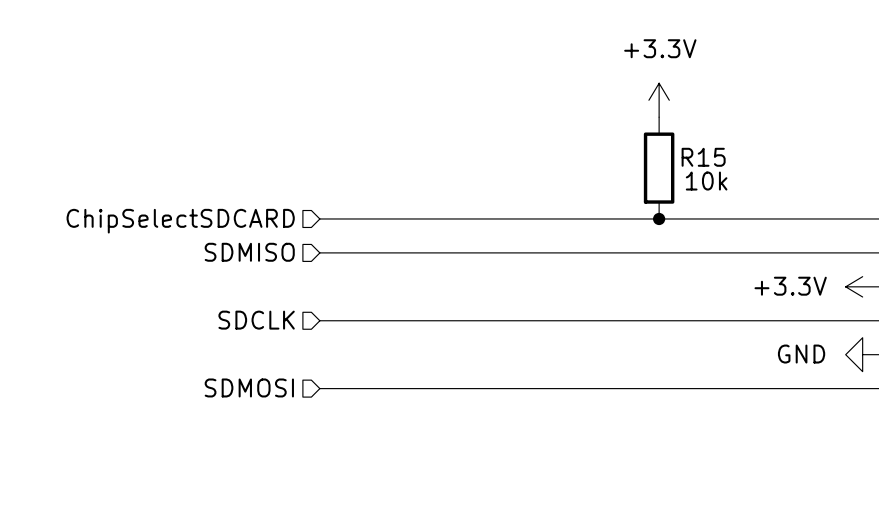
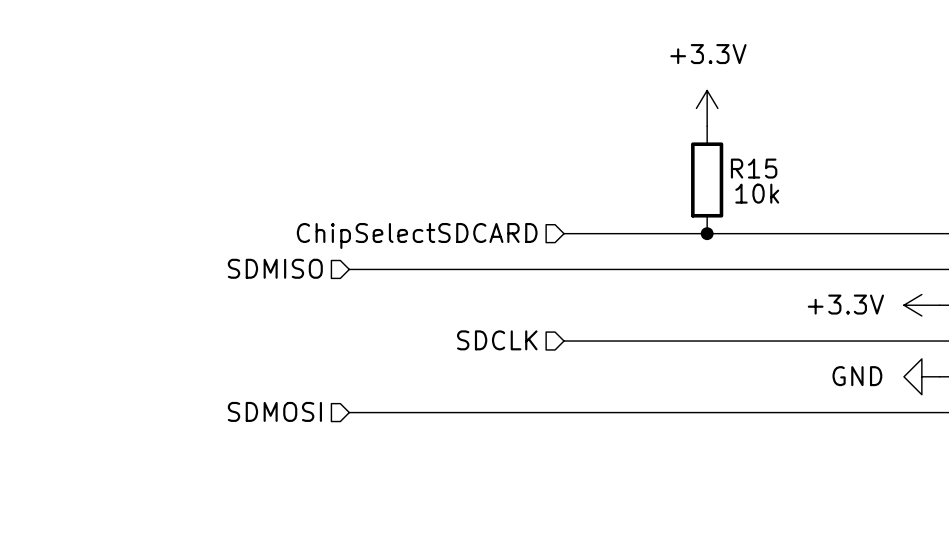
wire: (319, 218) (523, 218) -> none
hierarchical label position: ChipSelectSDCARD (180, 221) -> ChipSelectSDCARD (417, 235)
hierarchical label position: SDCLK (256, 320) -> SDCLK (497, 340)
wire: (319, 320) (523, 320) -> none

